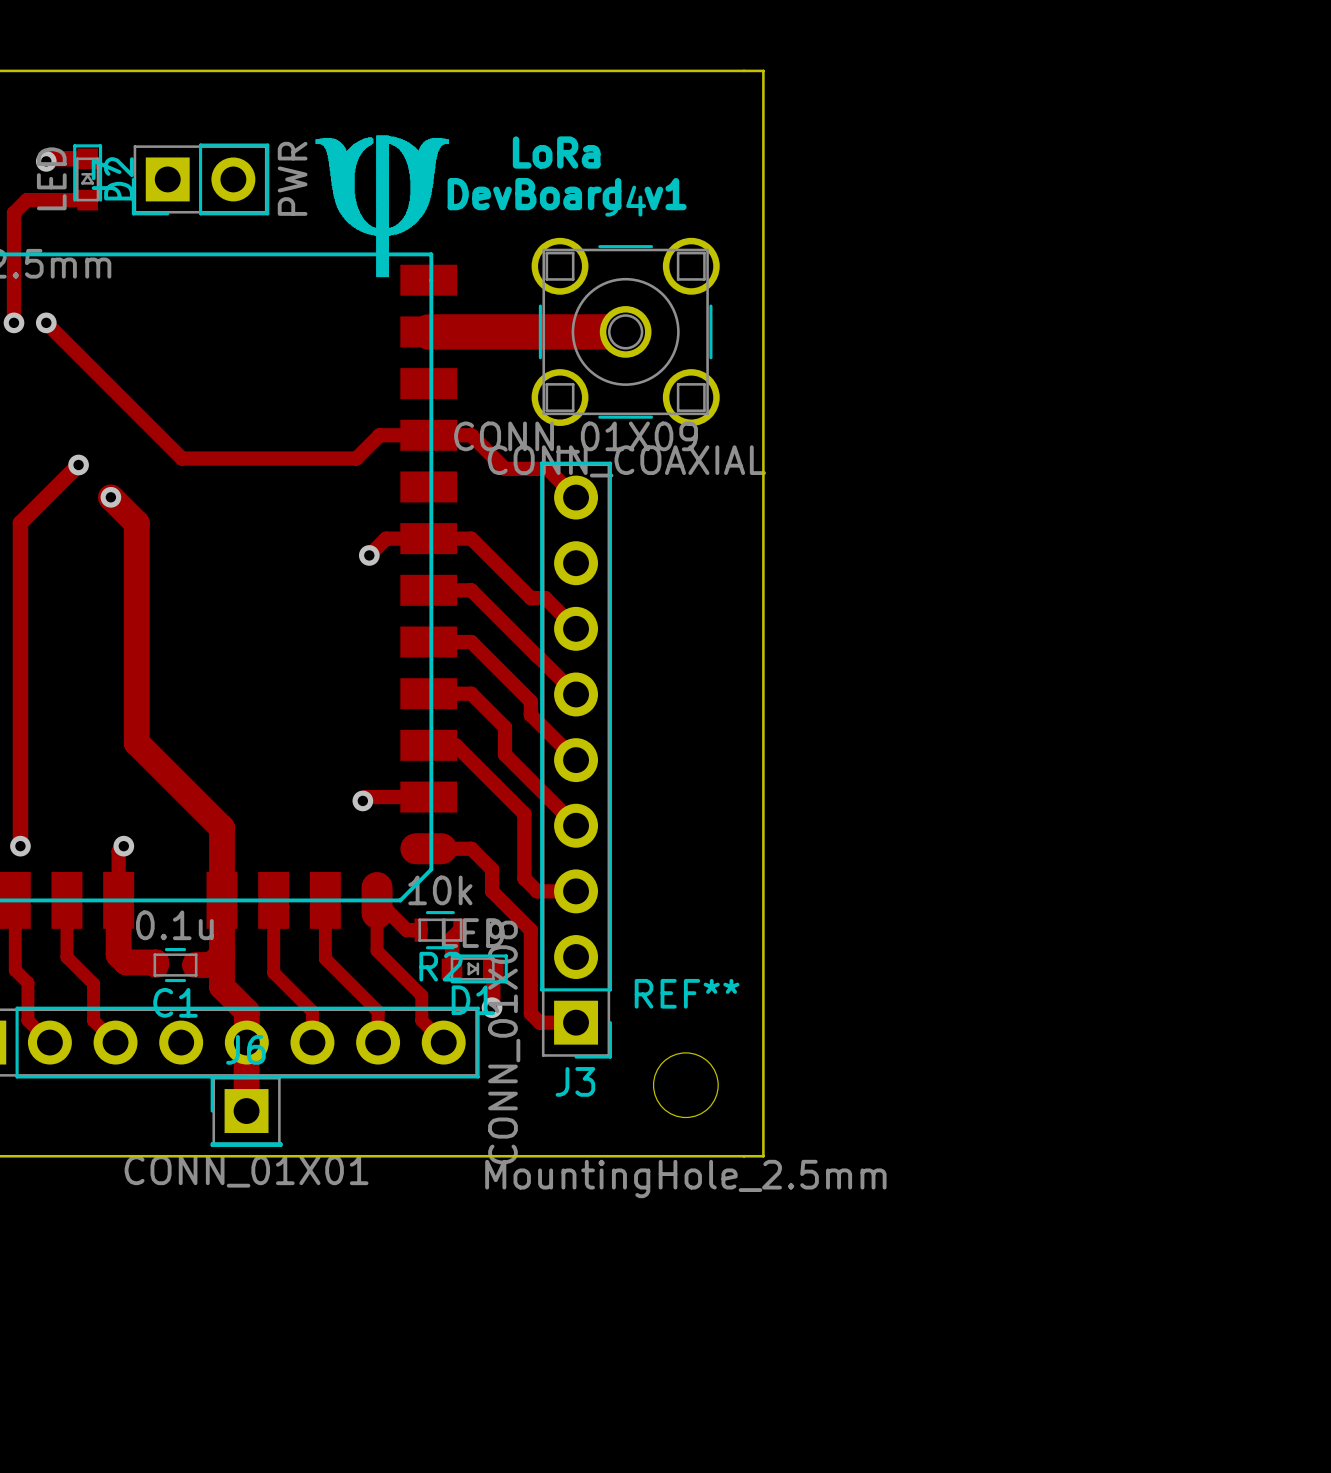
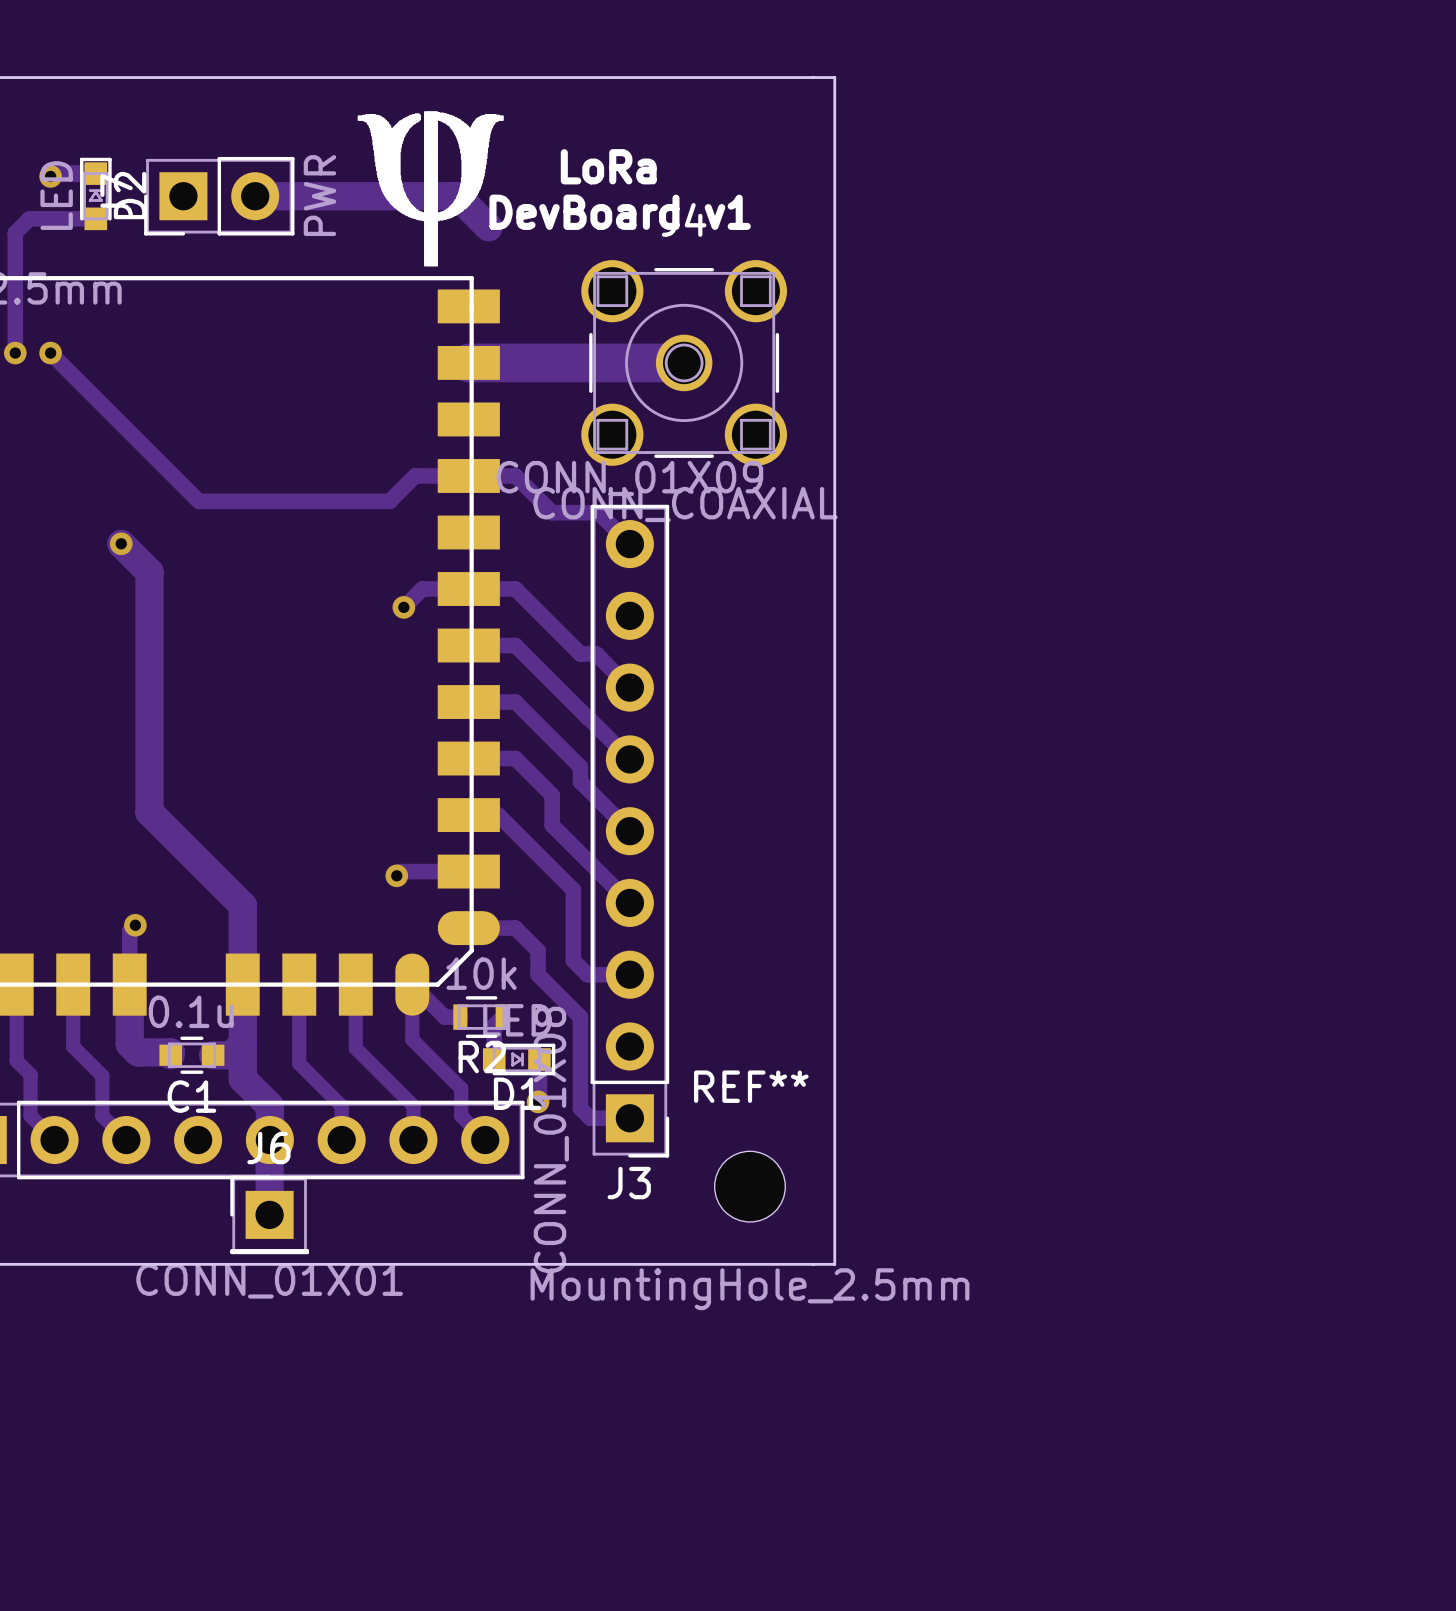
track: none -> (255, 196) (457, 196) (488, 227)
drawing position: (382, 206) -> (430, 188)
track: (78, 465) (20, 523) (20, 846) -> none
via: (78, 465) -> none
via: (20, 846) -> none

